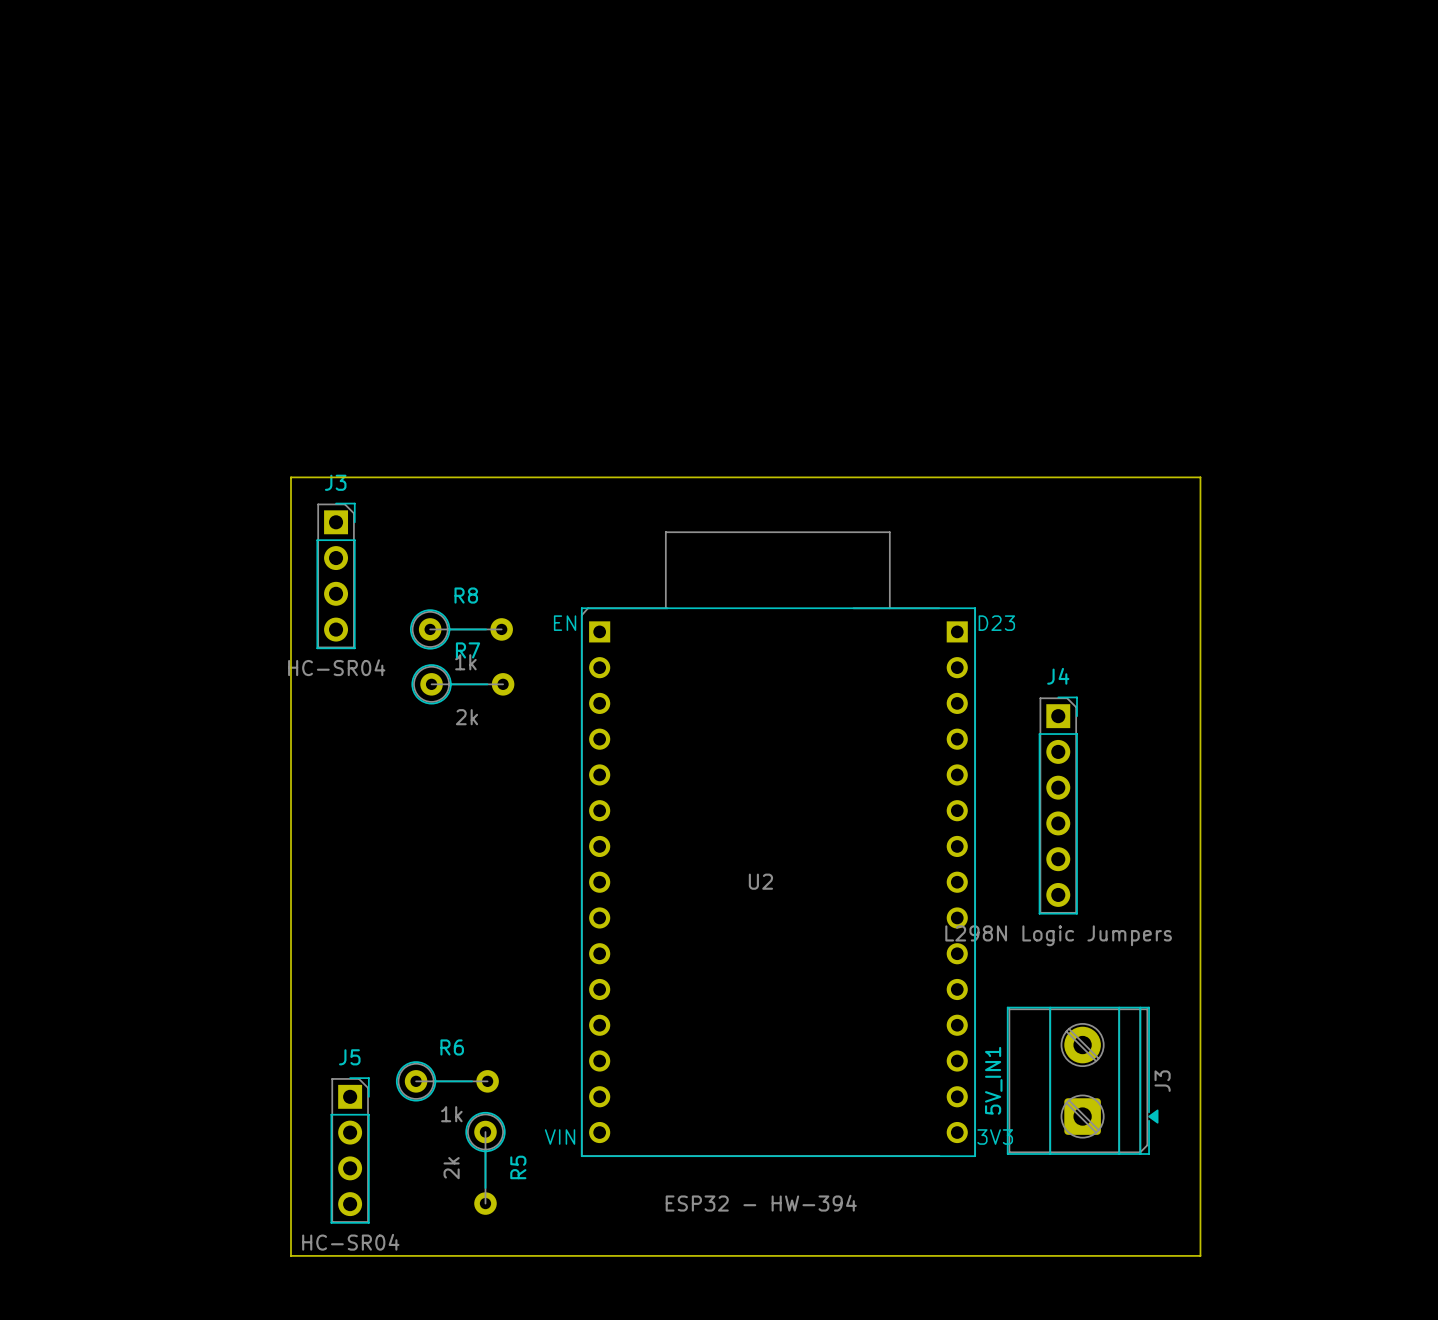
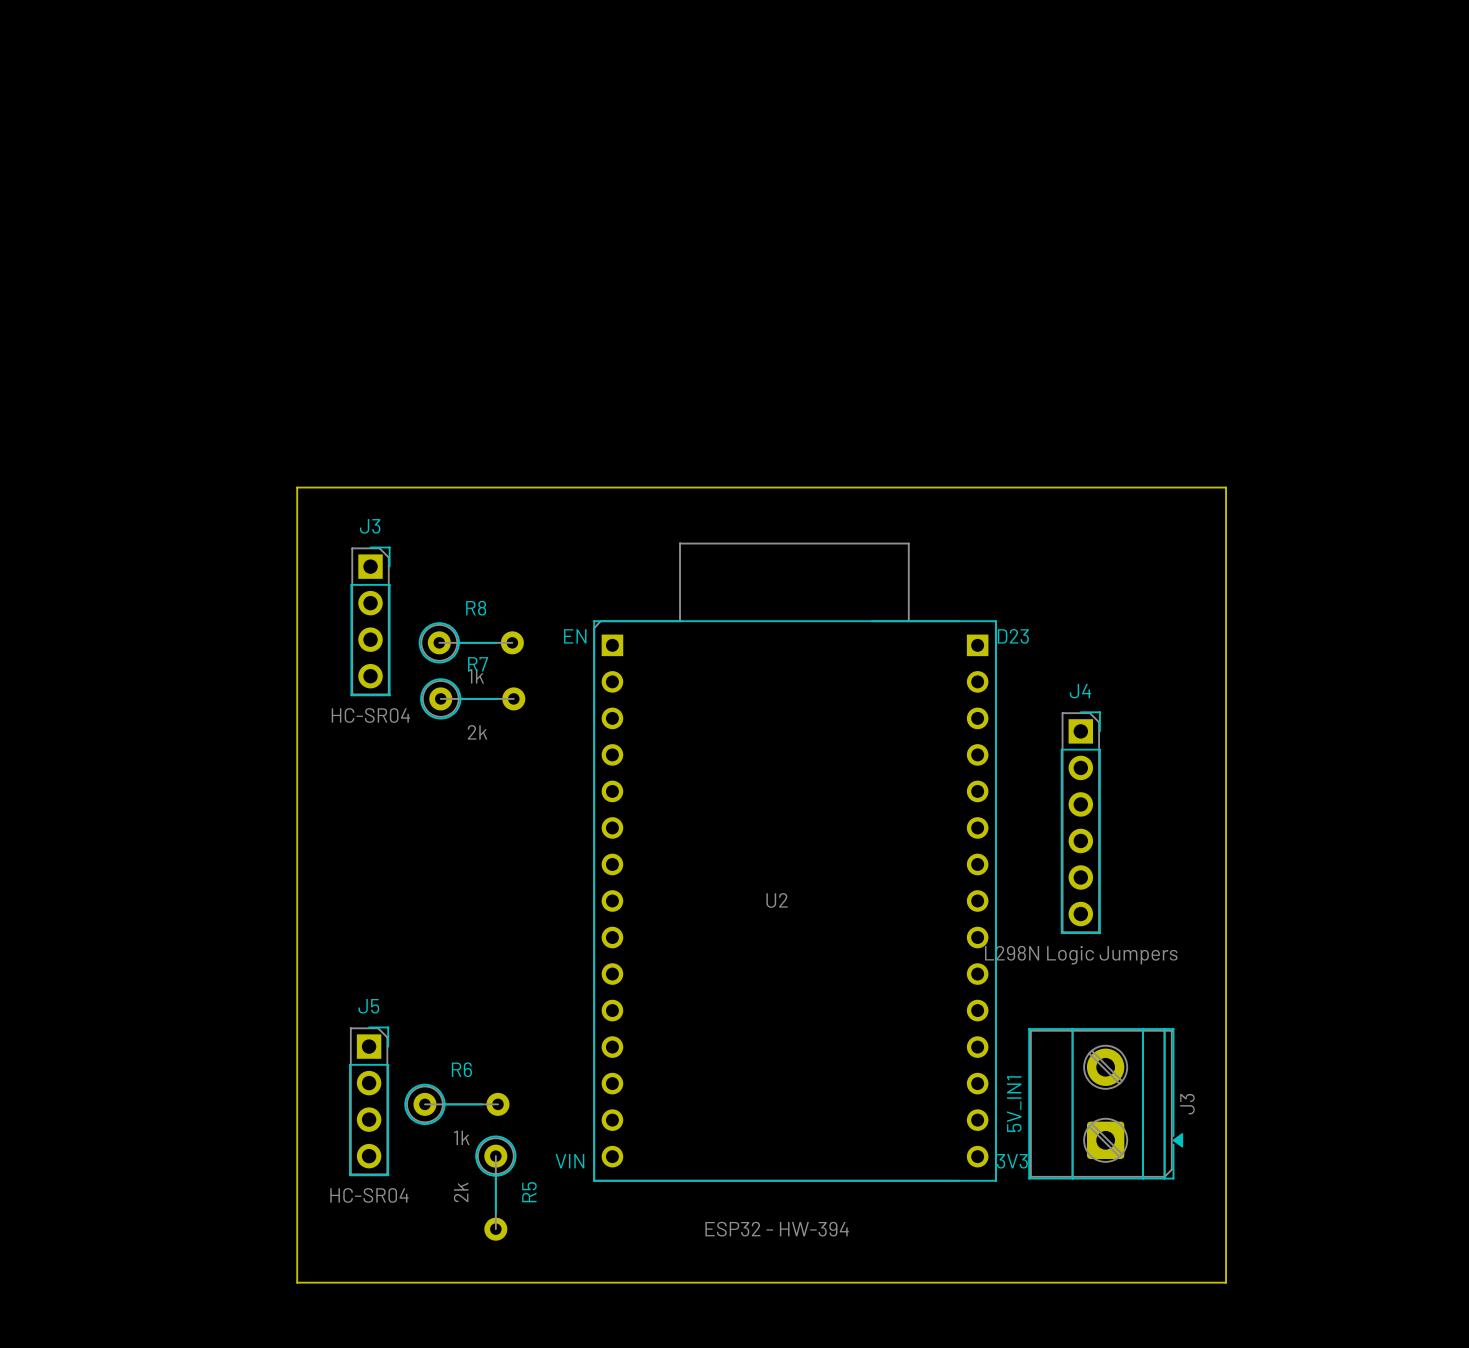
J3 position: (336, 575) -> (370, 621)
J5 position: (350, 1150) -> (369, 1101)

